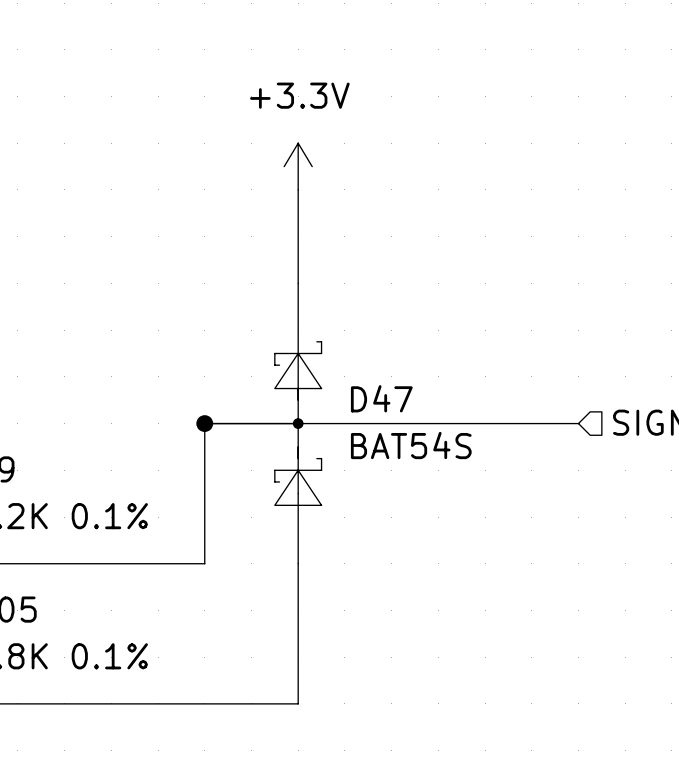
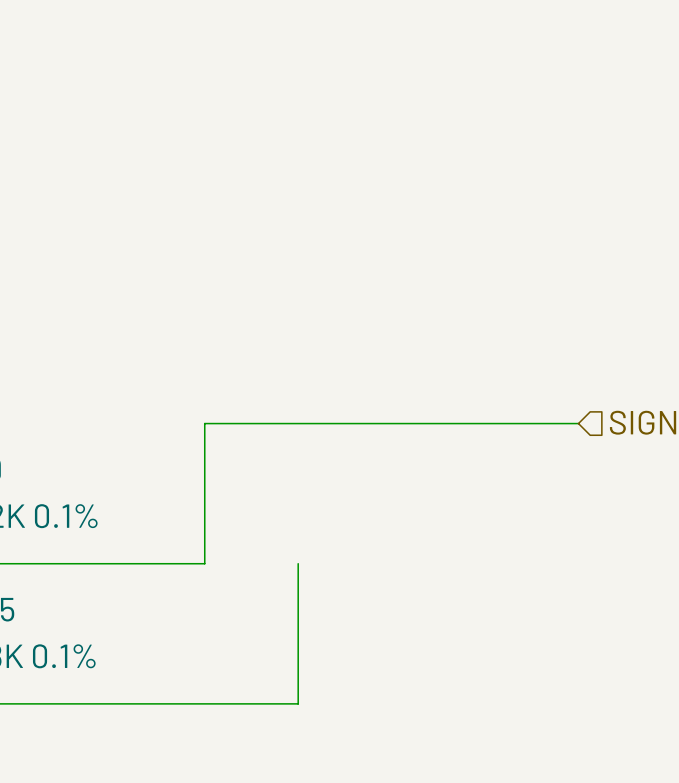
power symbol: +3.3V (298, 166) -> none
wire: (298, 189) (298, 283) -> none
junction: (204, 423) -> none
D47: BAT54S (263, 423) -> none

